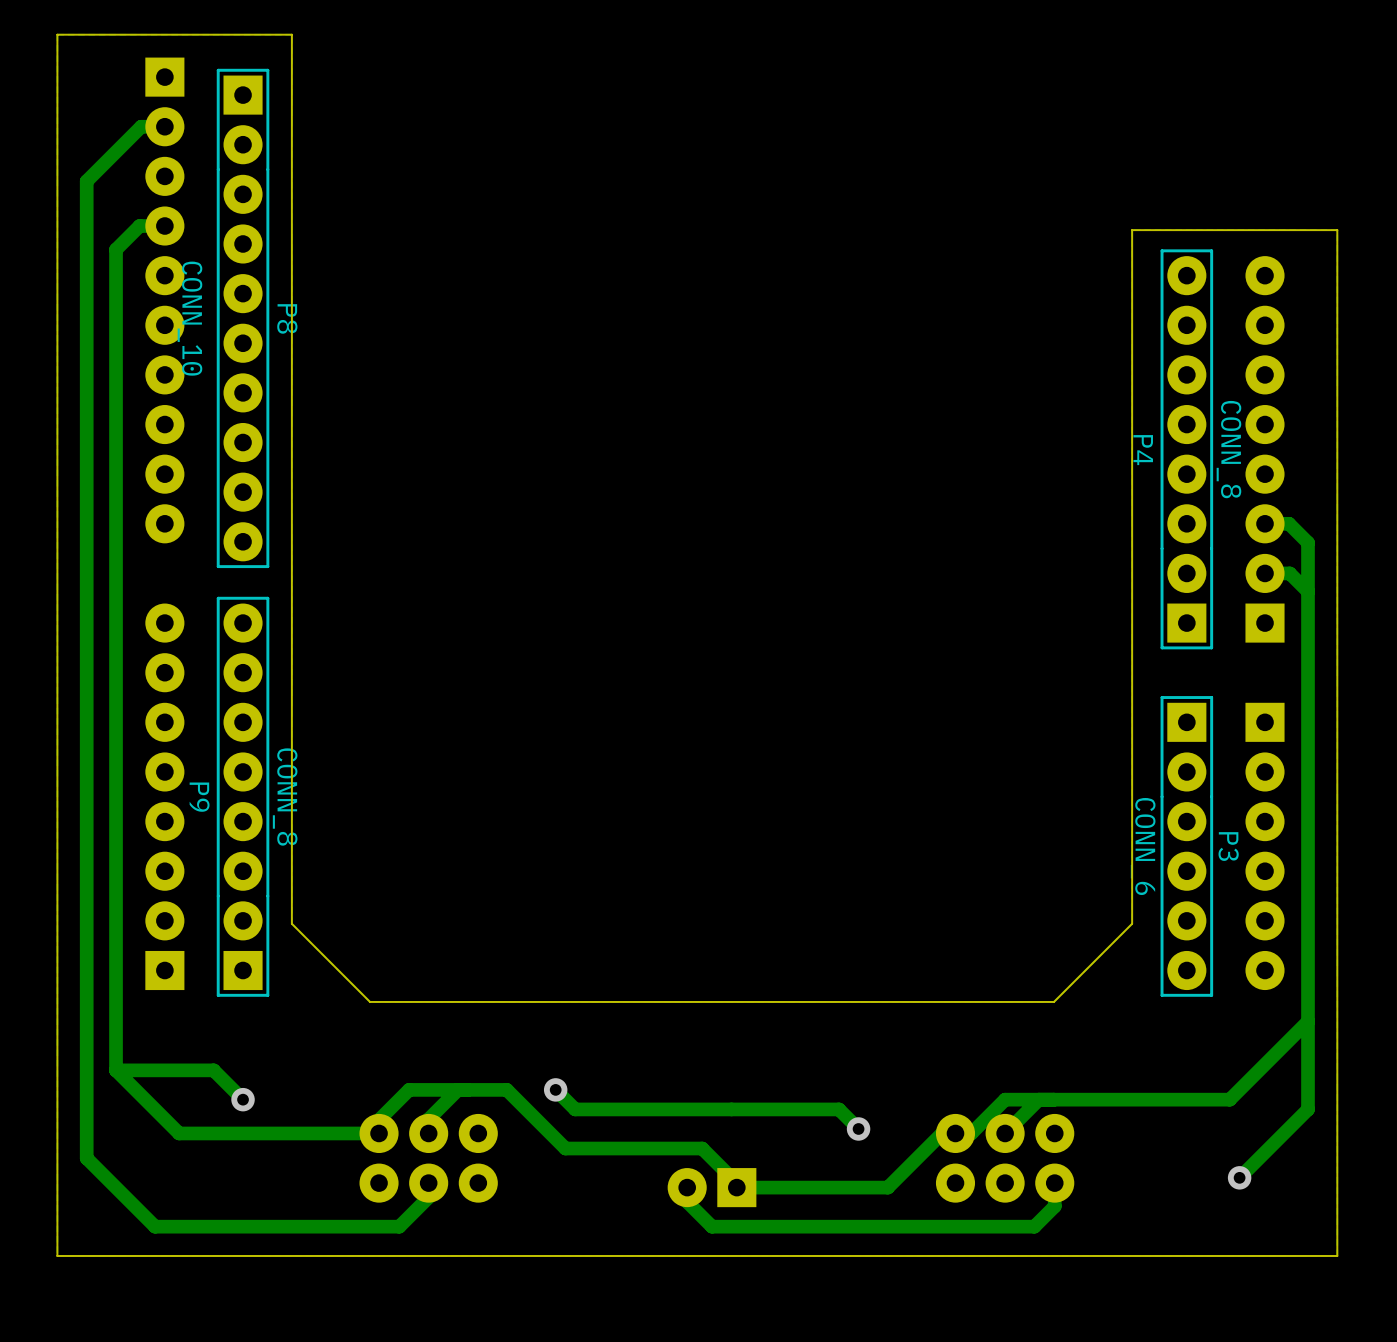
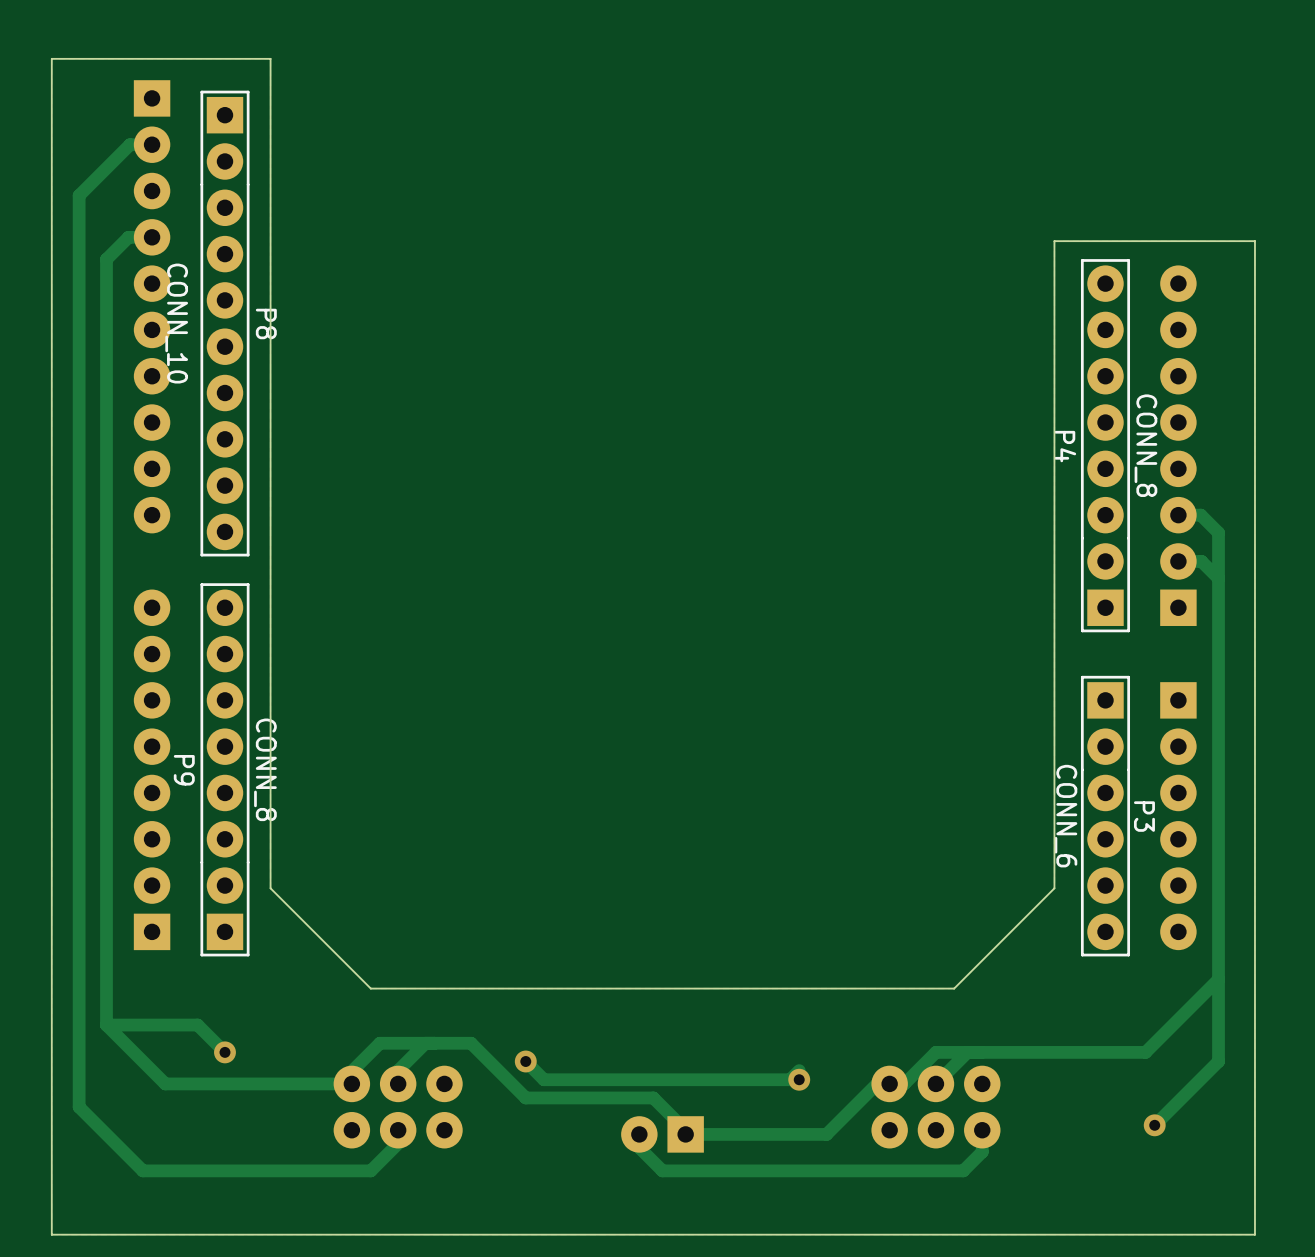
board edge: (1337, 230) (1337, 1255) (57, 1255) -> (1245, 241) (1254, 241) (1254, 1234) (51, 1234) (51, 1198)
board edge: (1053, 1001) (370, 1001) -> (981, 961) (954, 988) (370, 988) (343, 961)
track: (555, 1089) (575, 1109) (839, 1109) (858, 1128) -> none
via position: (555, 1089) -> (525, 1061)
track: none -> (525, 1061) (544, 1079) (790, 1079) (799, 1070)

